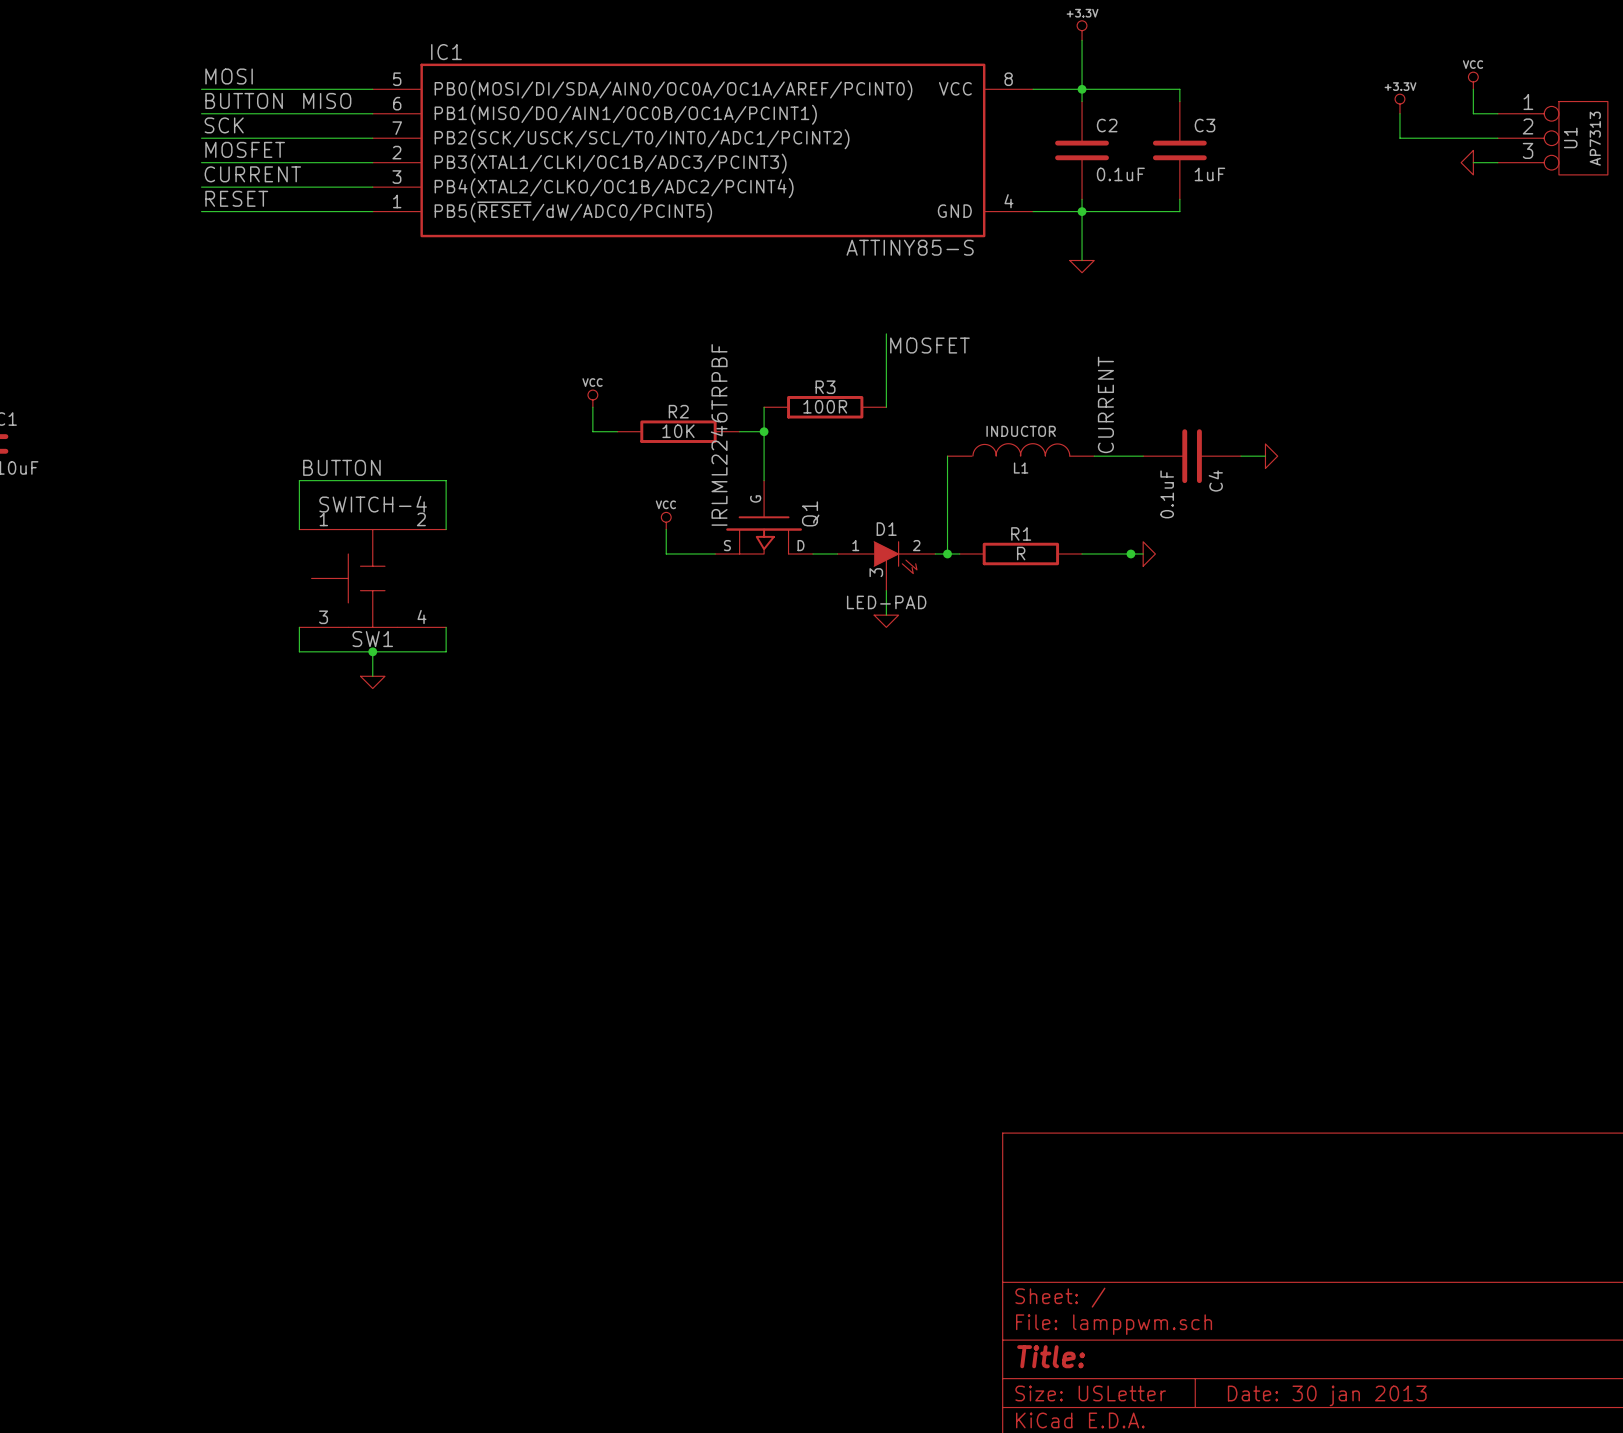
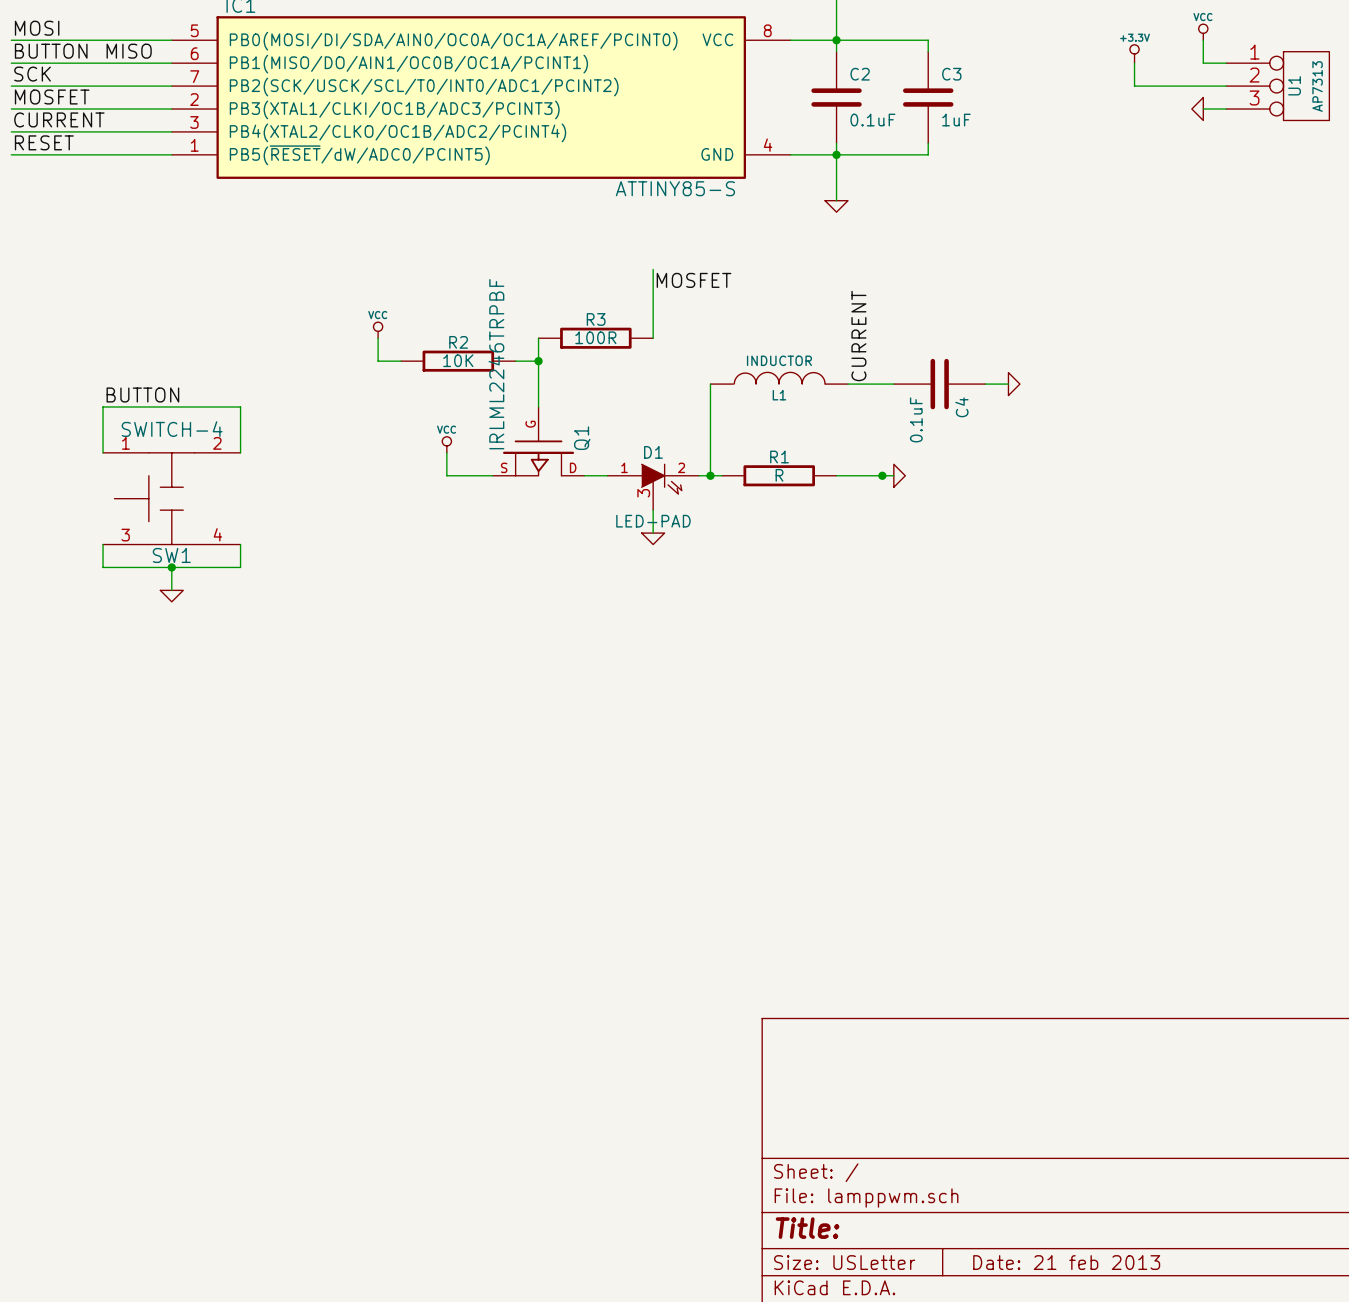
title block: Date: 30 jan 2013 (1327, 1395) -> Date: 21 feb 2013 (1066, 1262)

